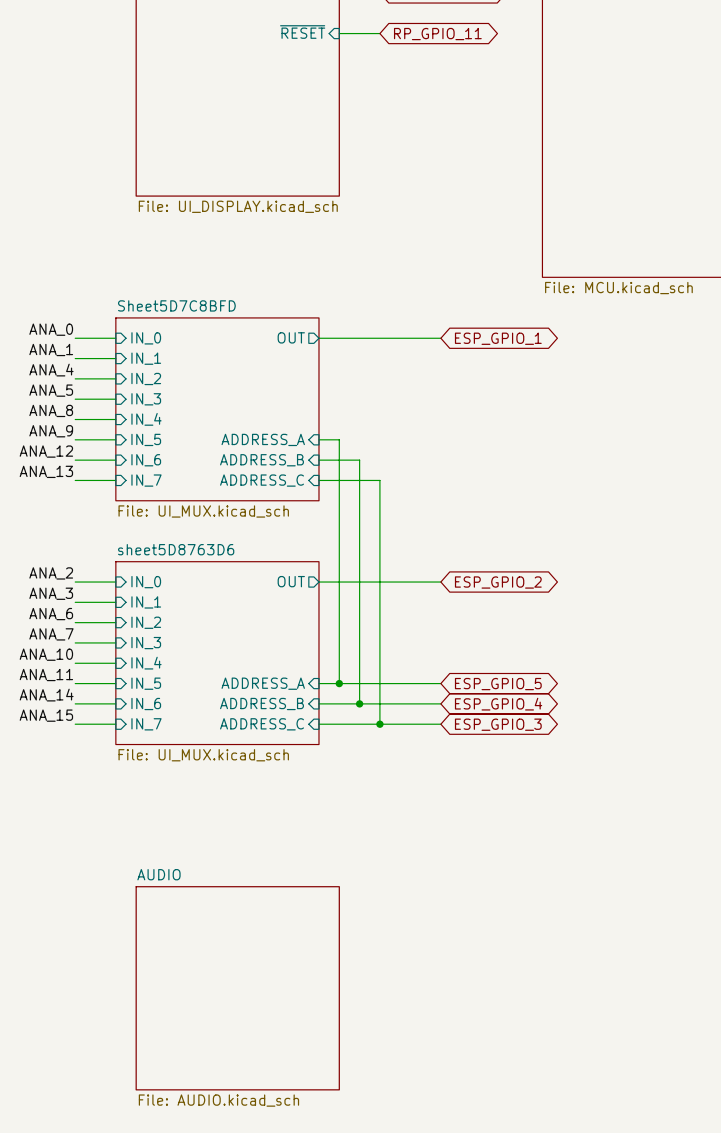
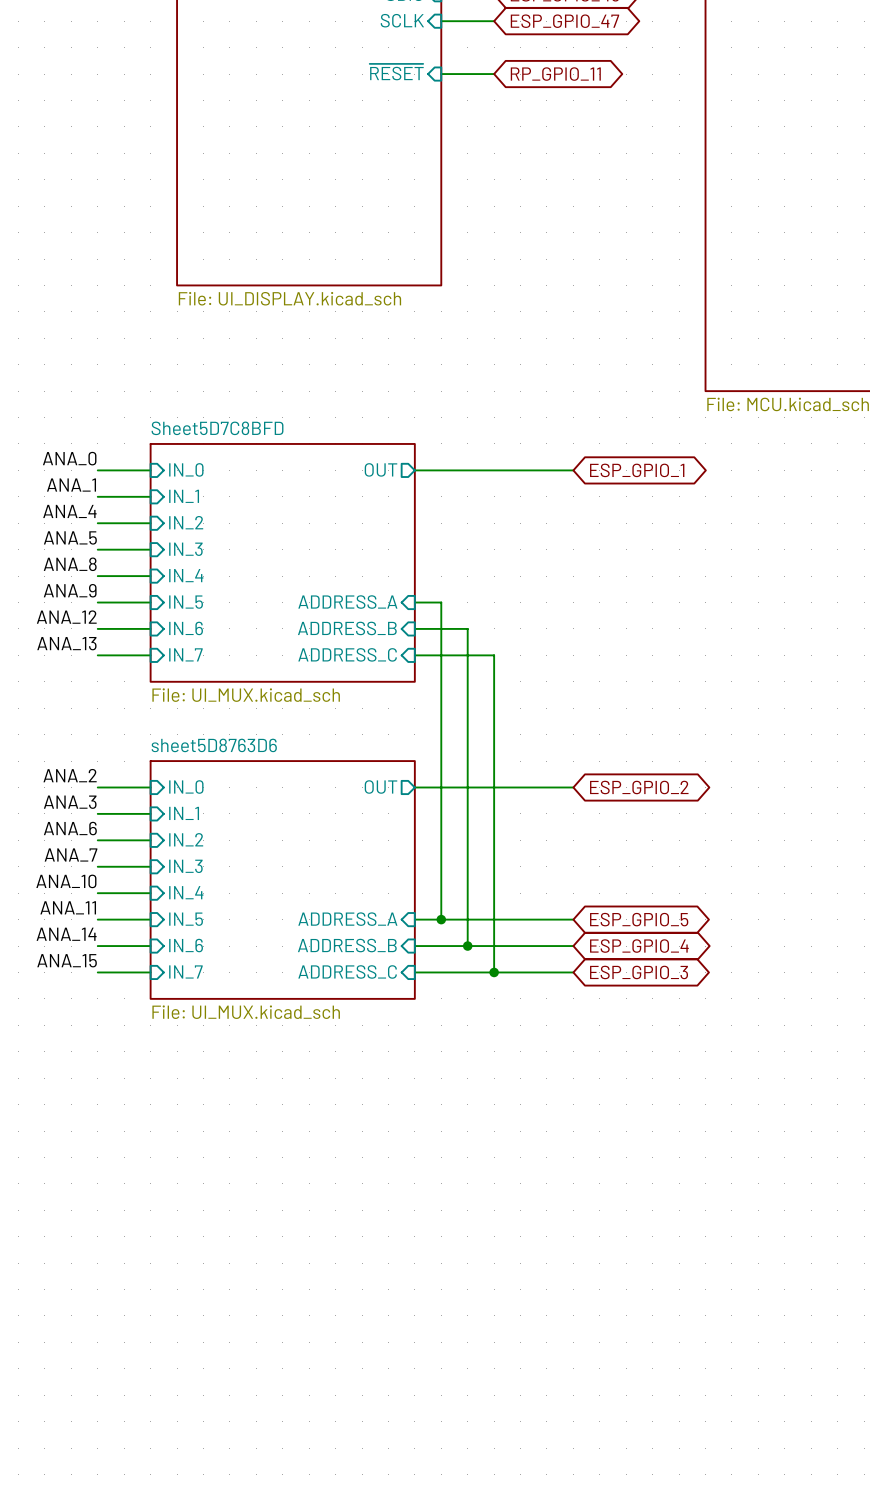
sheet AUDIO: File: AUDIO.kicad_sch (237, 988) -> none

